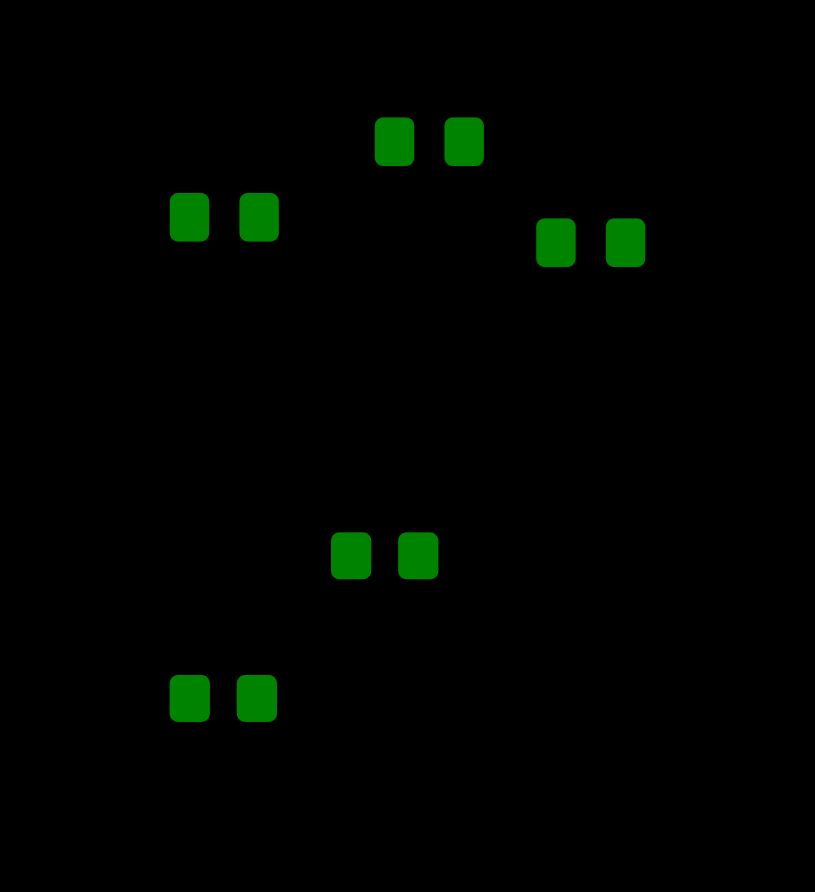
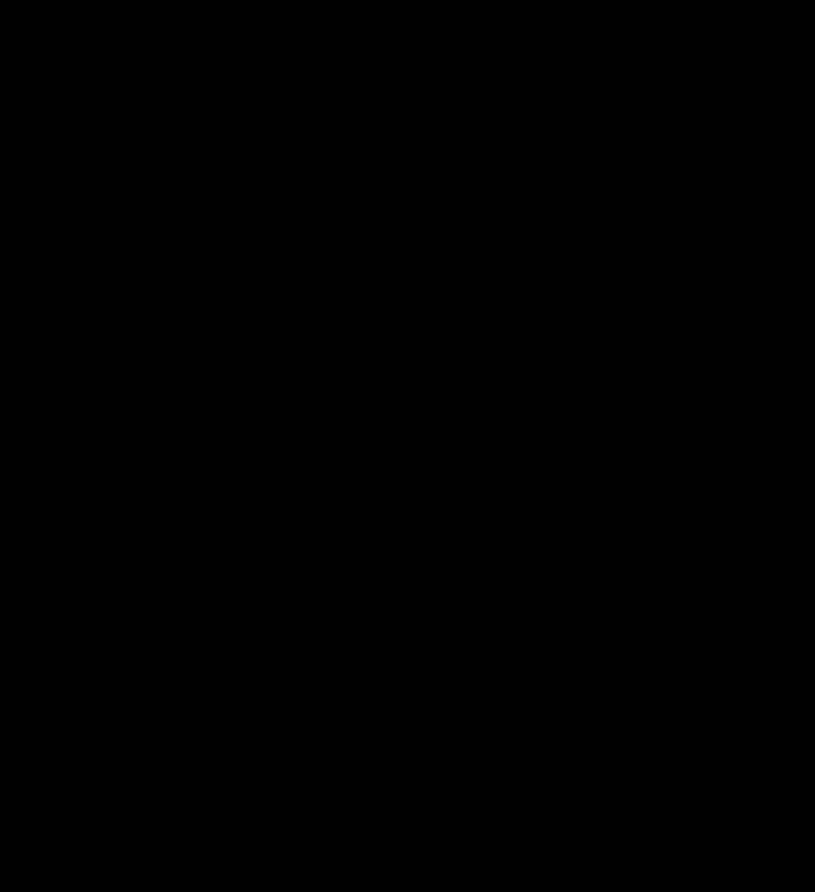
part: (429, 141) -> none
part: (224, 217) -> none
part: (590, 242) -> none
part: (384, 555) -> none
part: (223, 698) -> none

